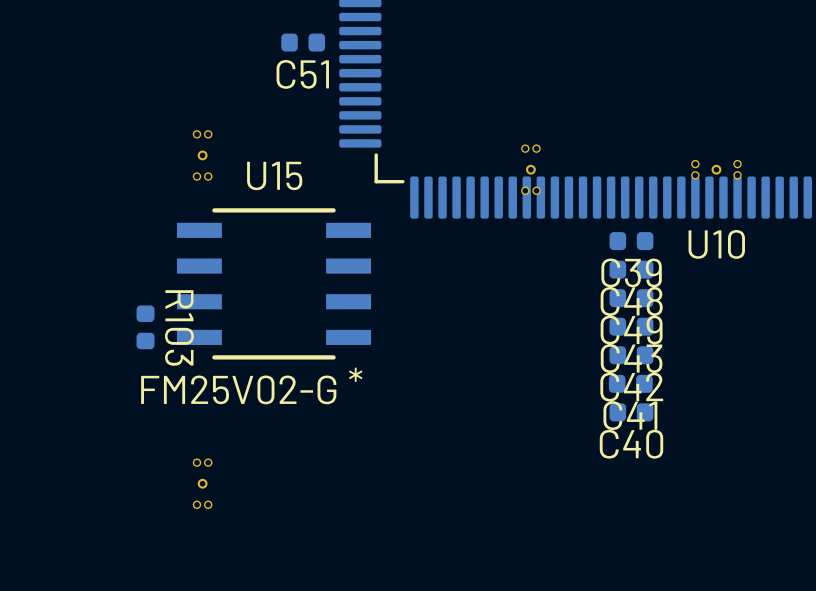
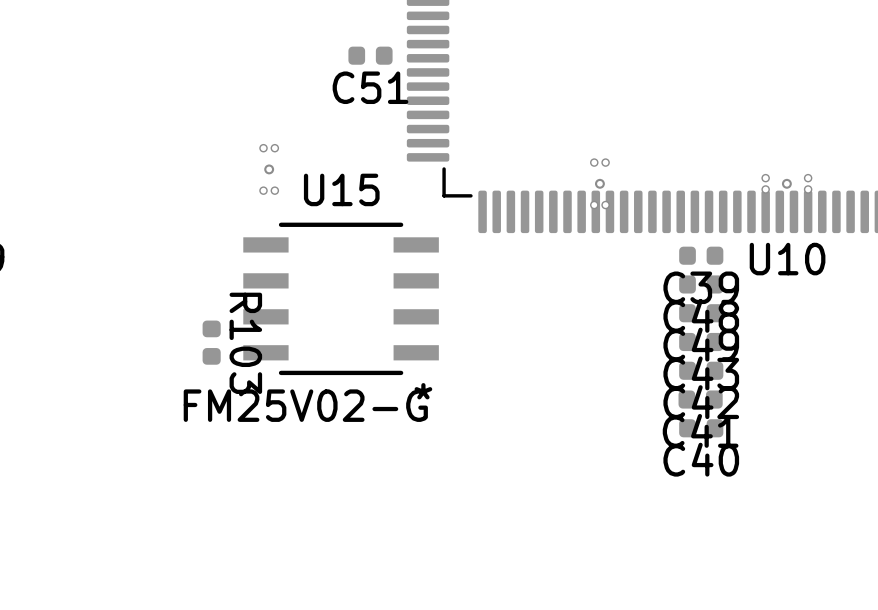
part: (202, 483) -> none

